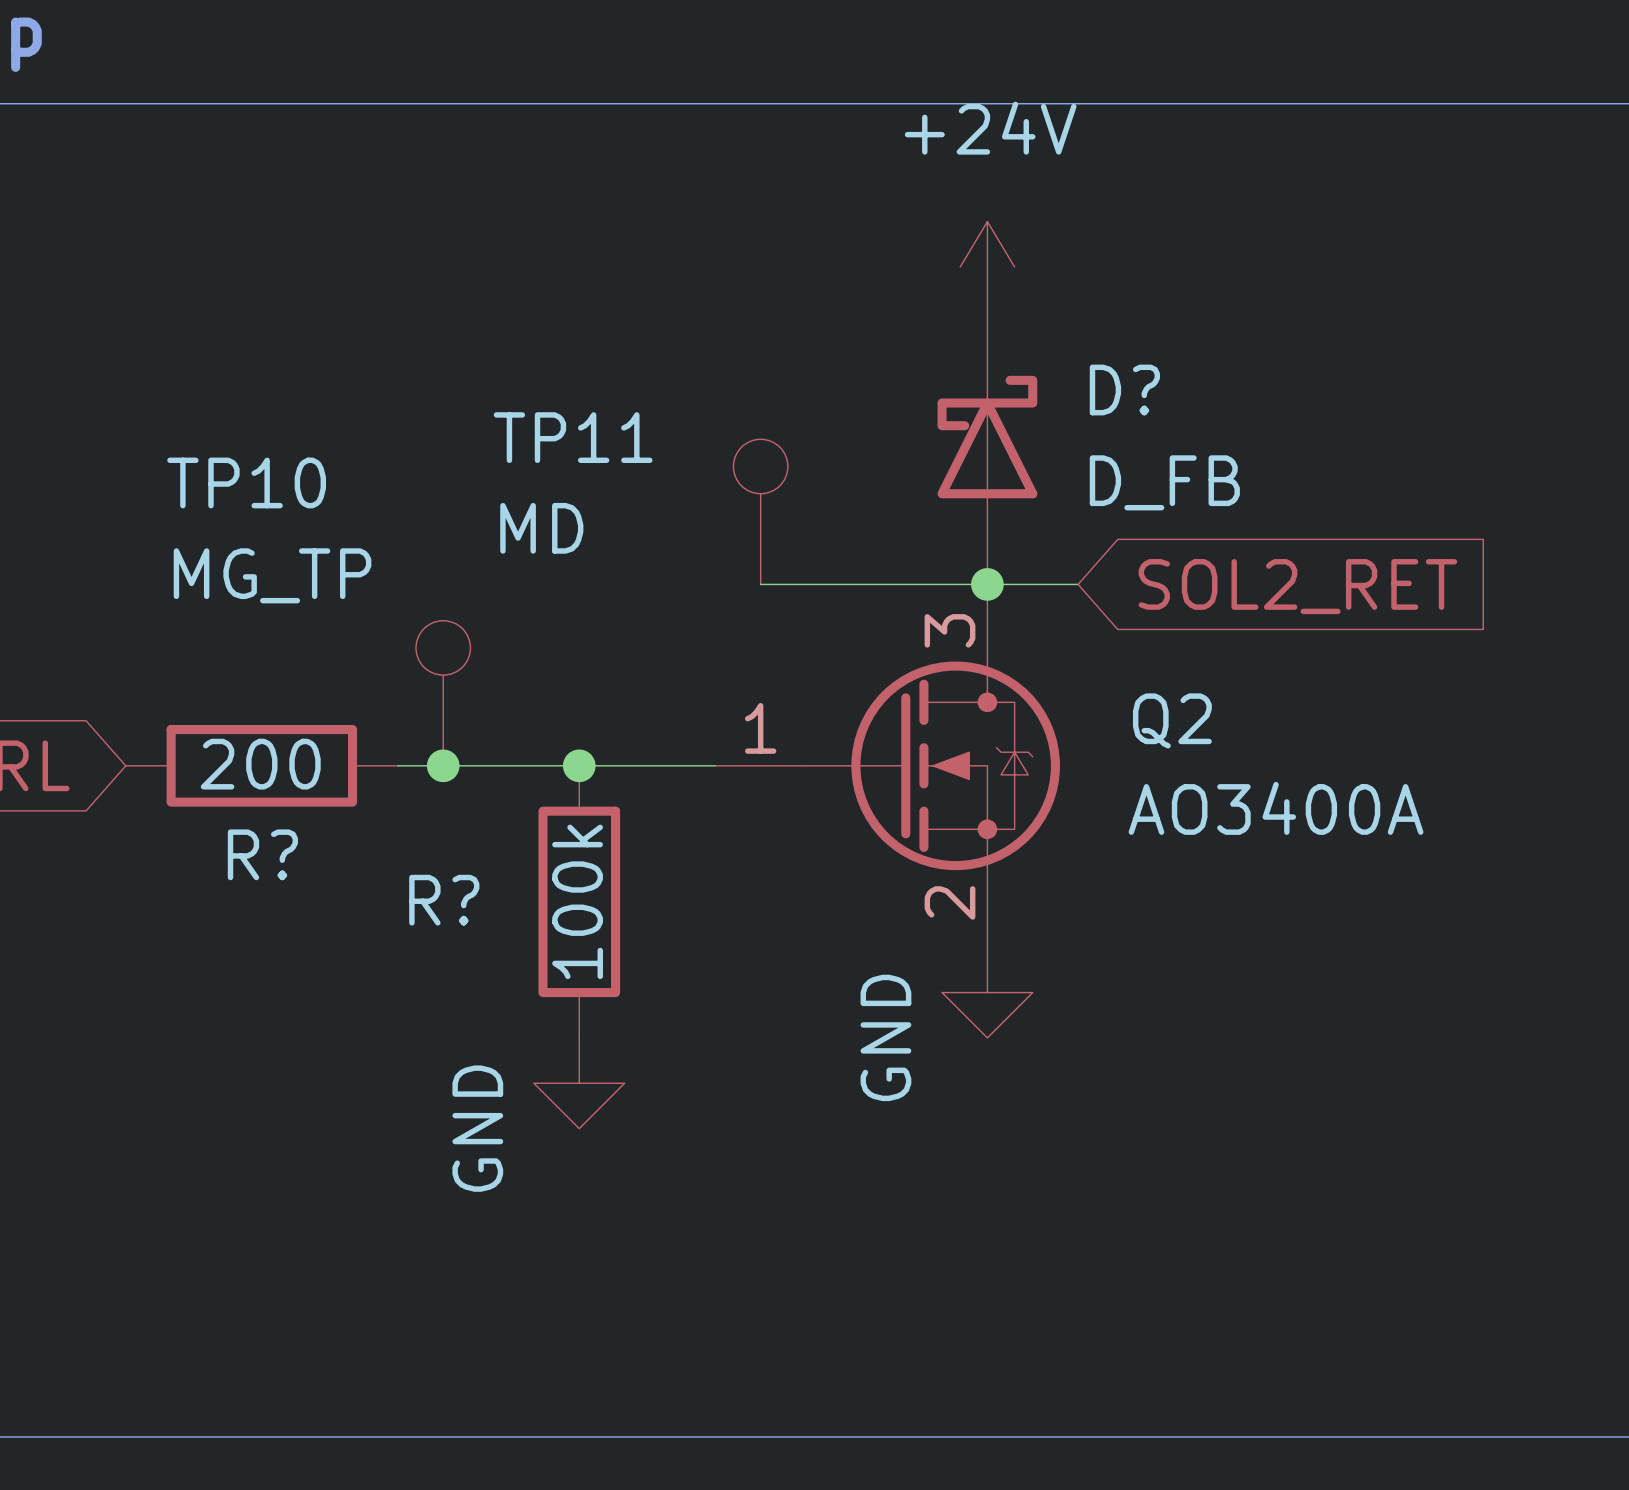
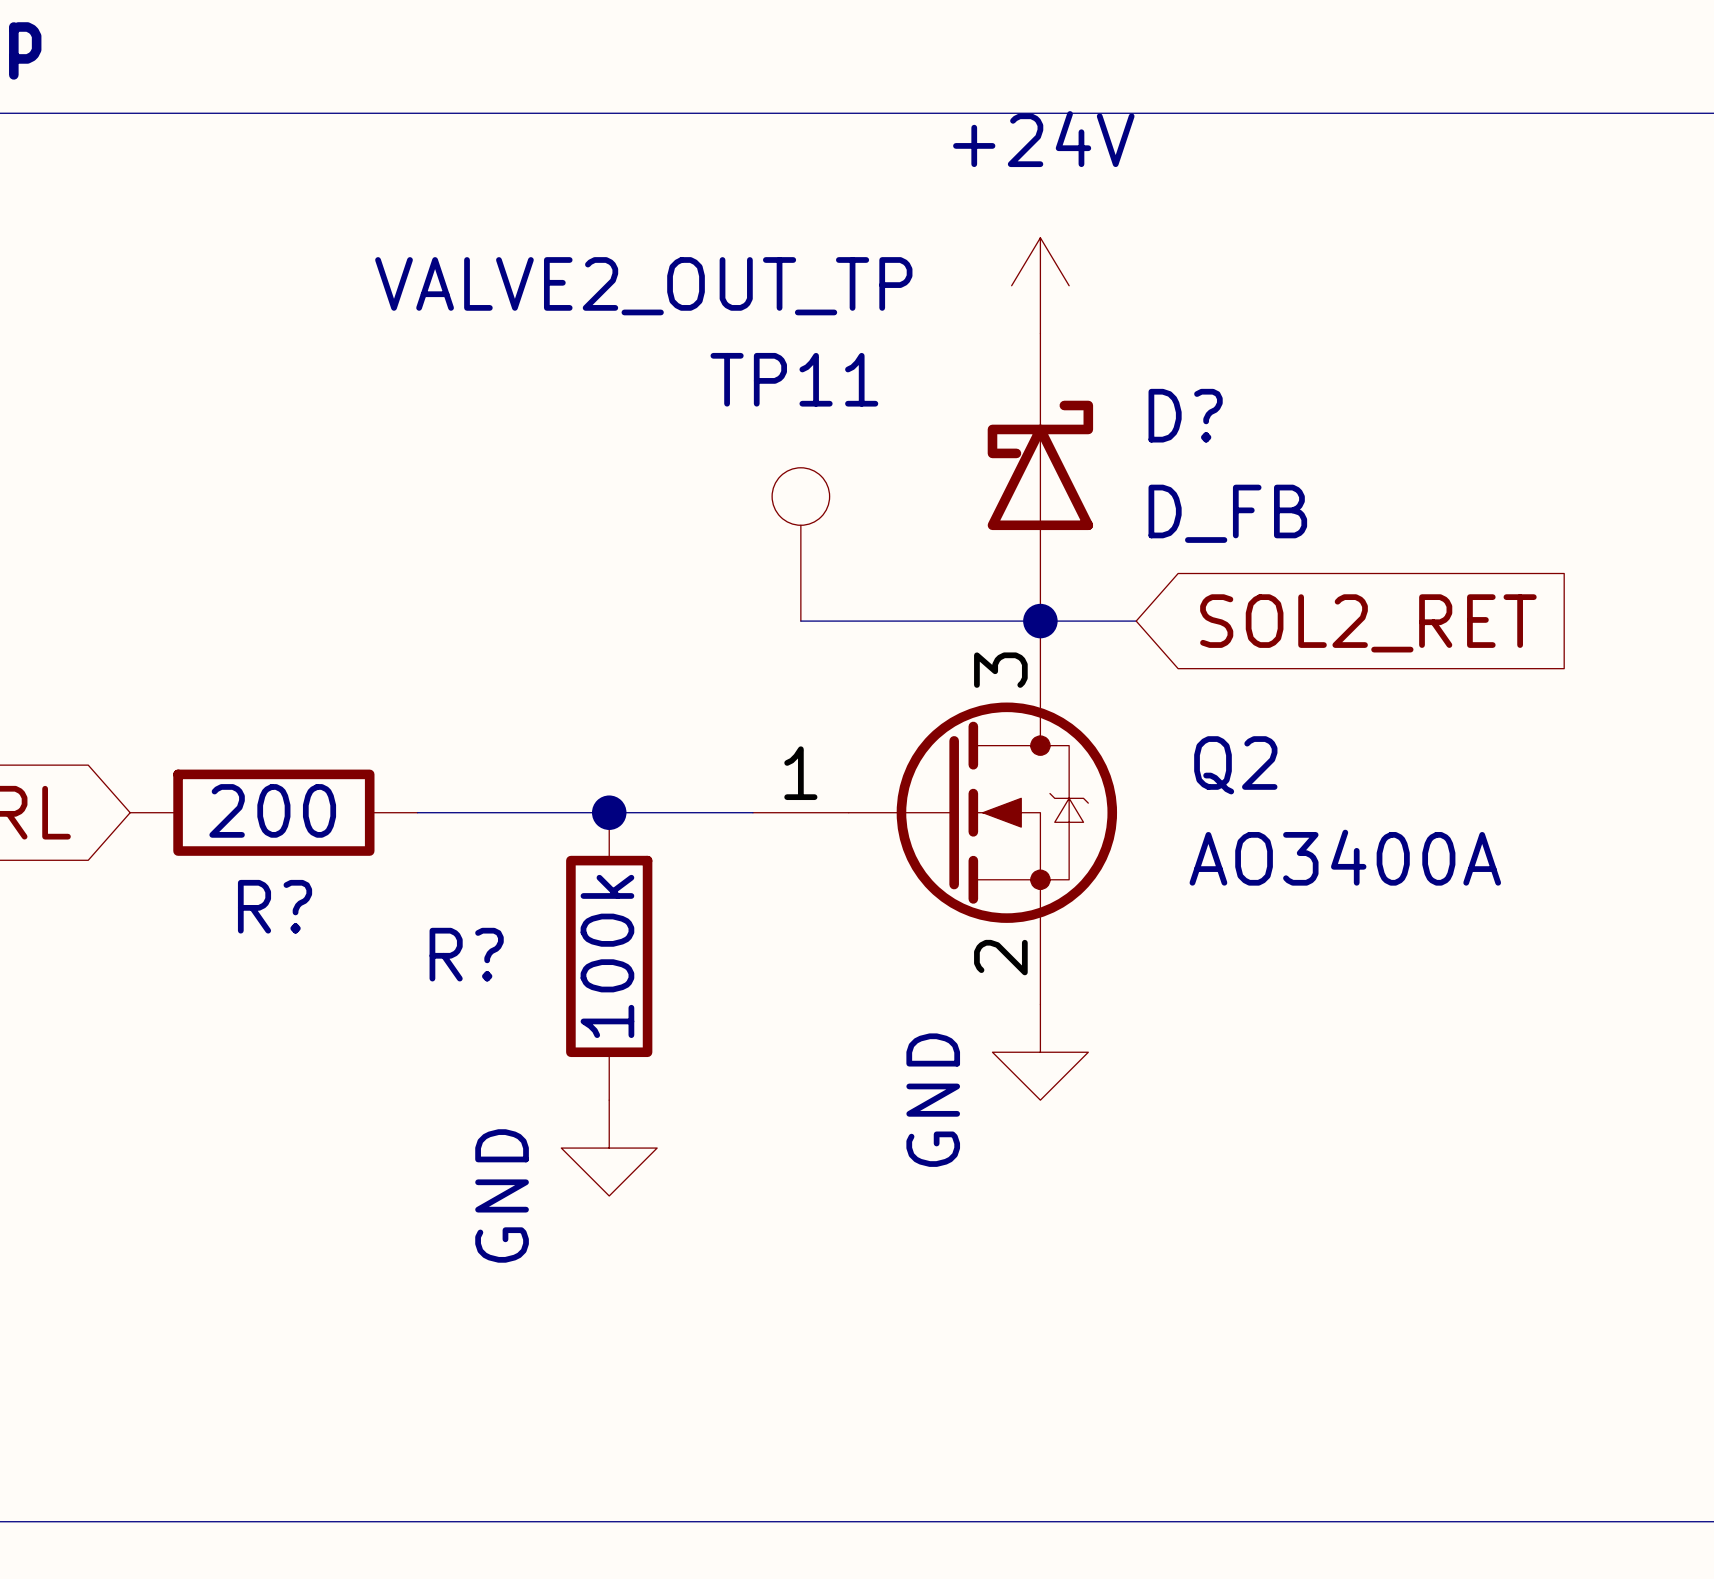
TP11 name position: TP11 (573, 437) -> TP11 (794, 379)
TP11 value: MD (541, 528) -> VALVE2_OUT_TP (643, 286)
TP10: MG_TP (443, 693) -> none
junction: (443, 765) -> none

